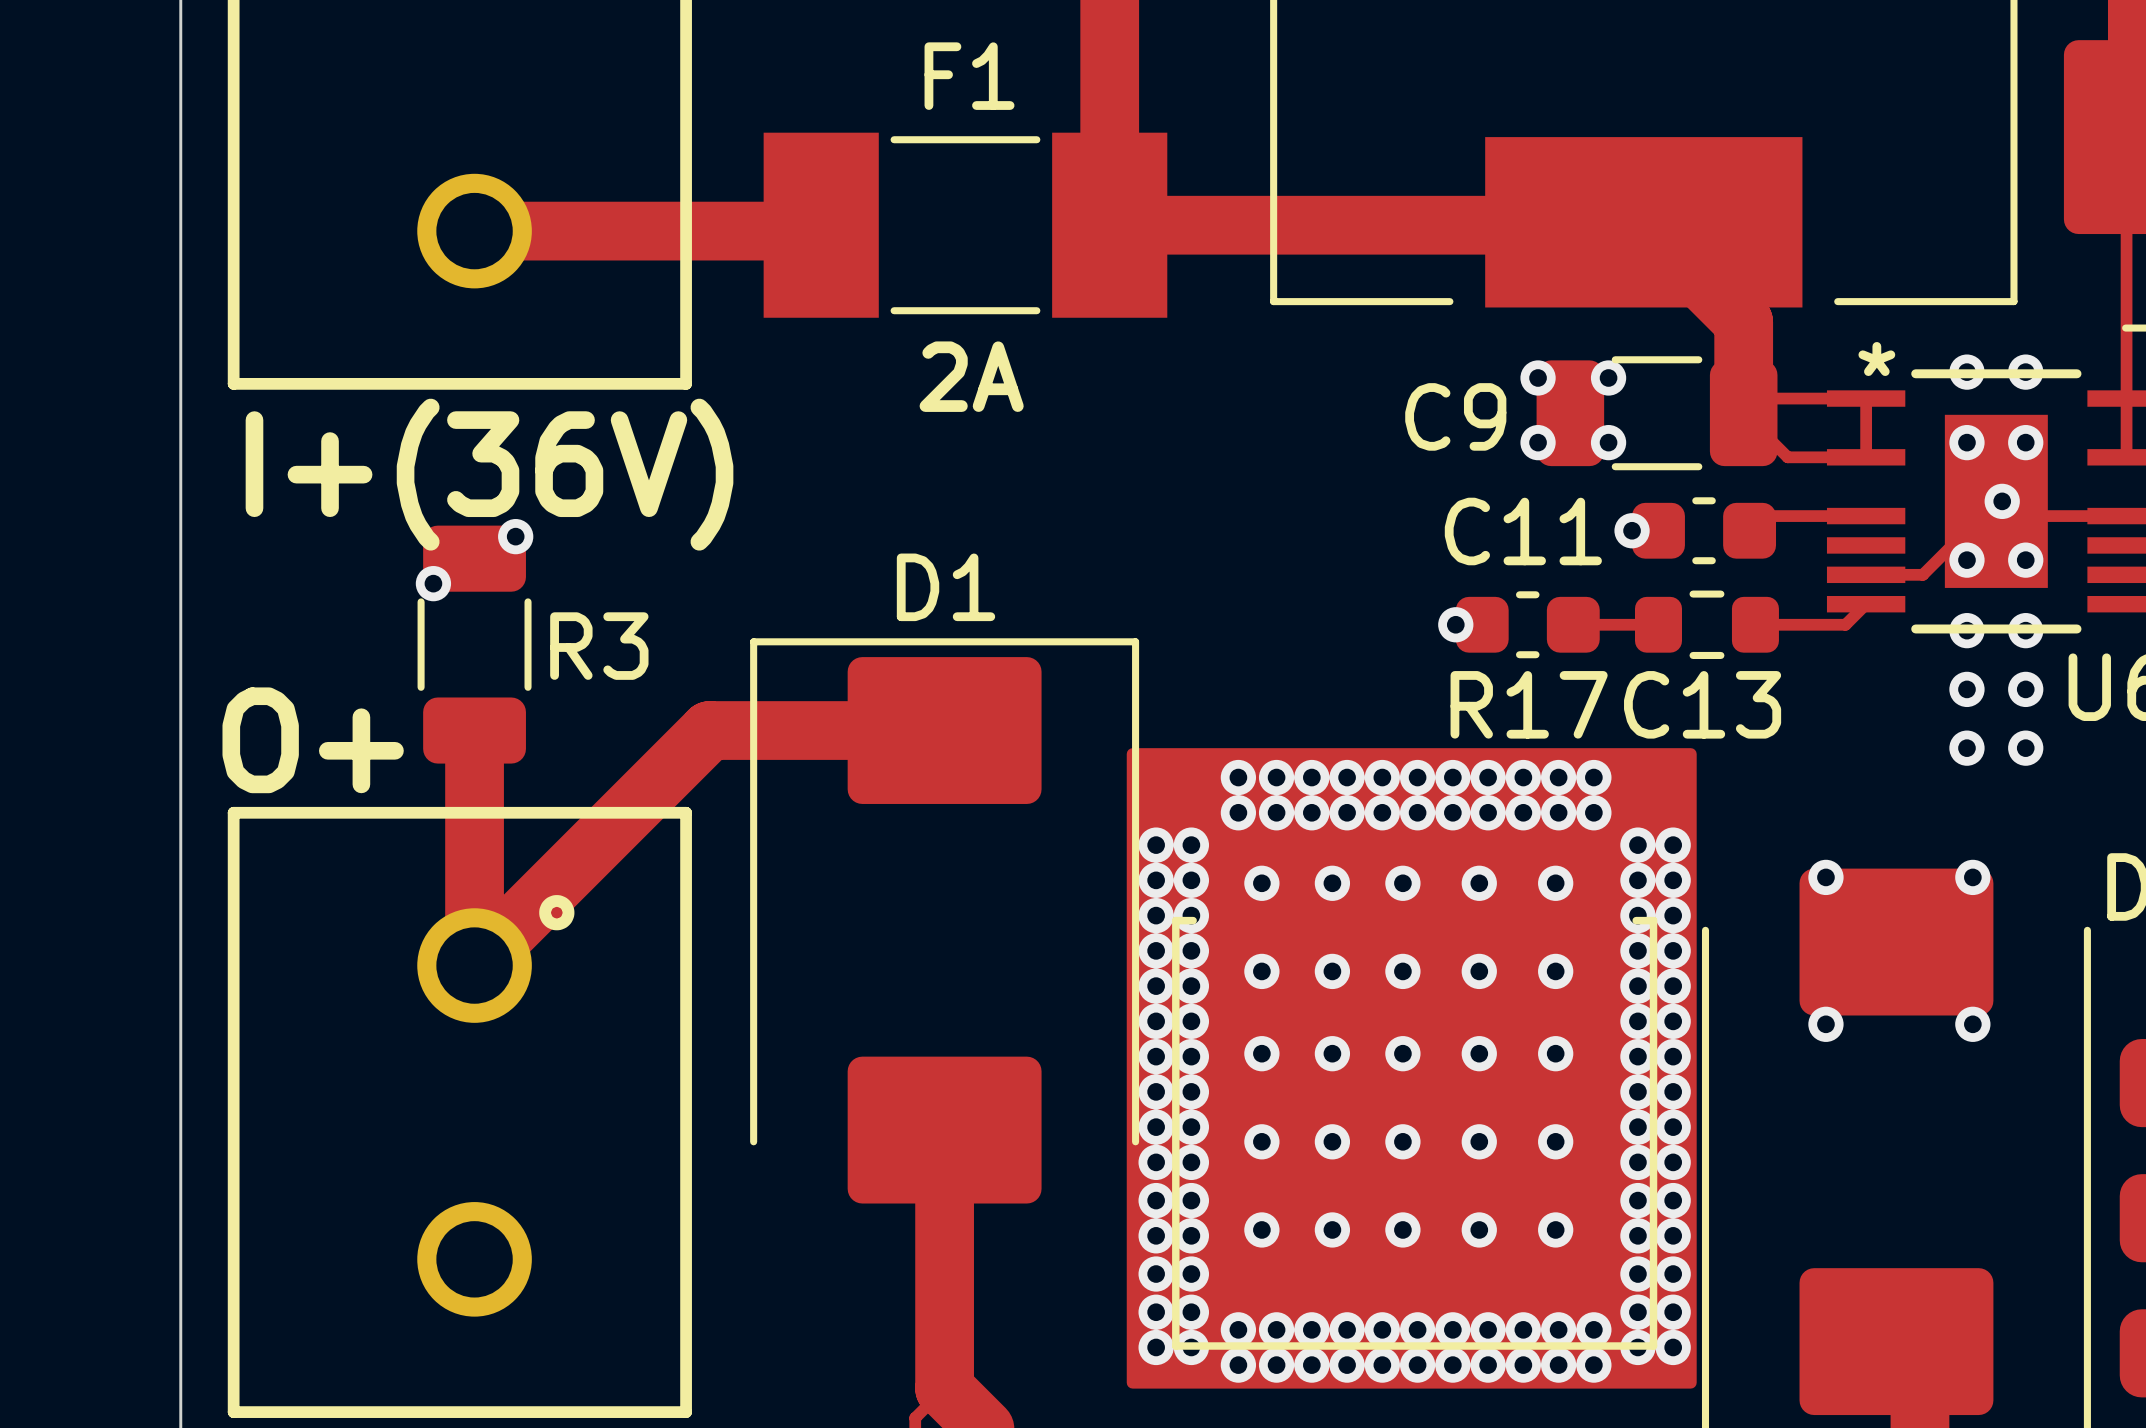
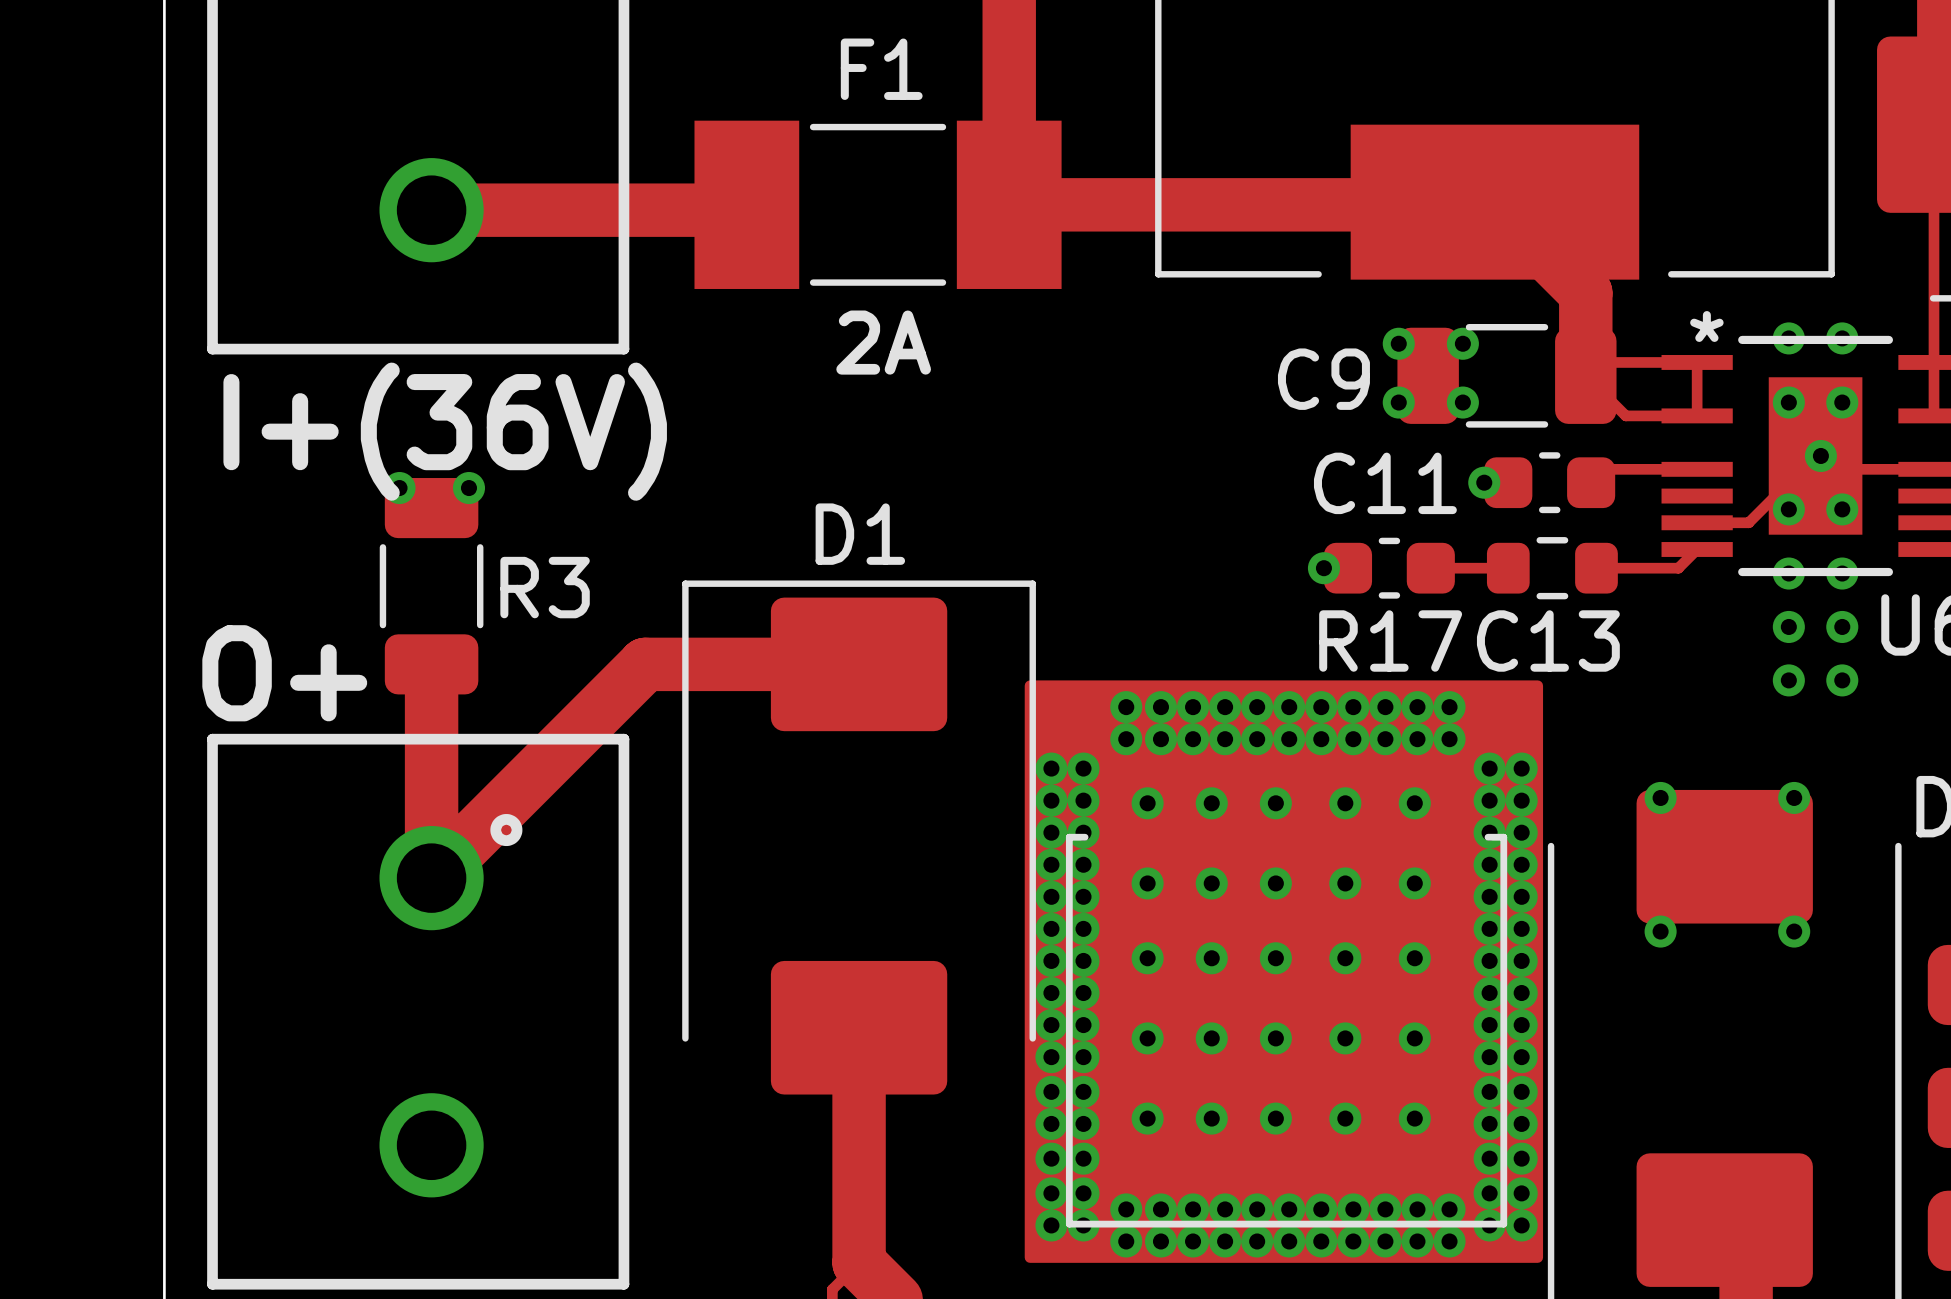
via position: (433, 583) -> (399, 488)

